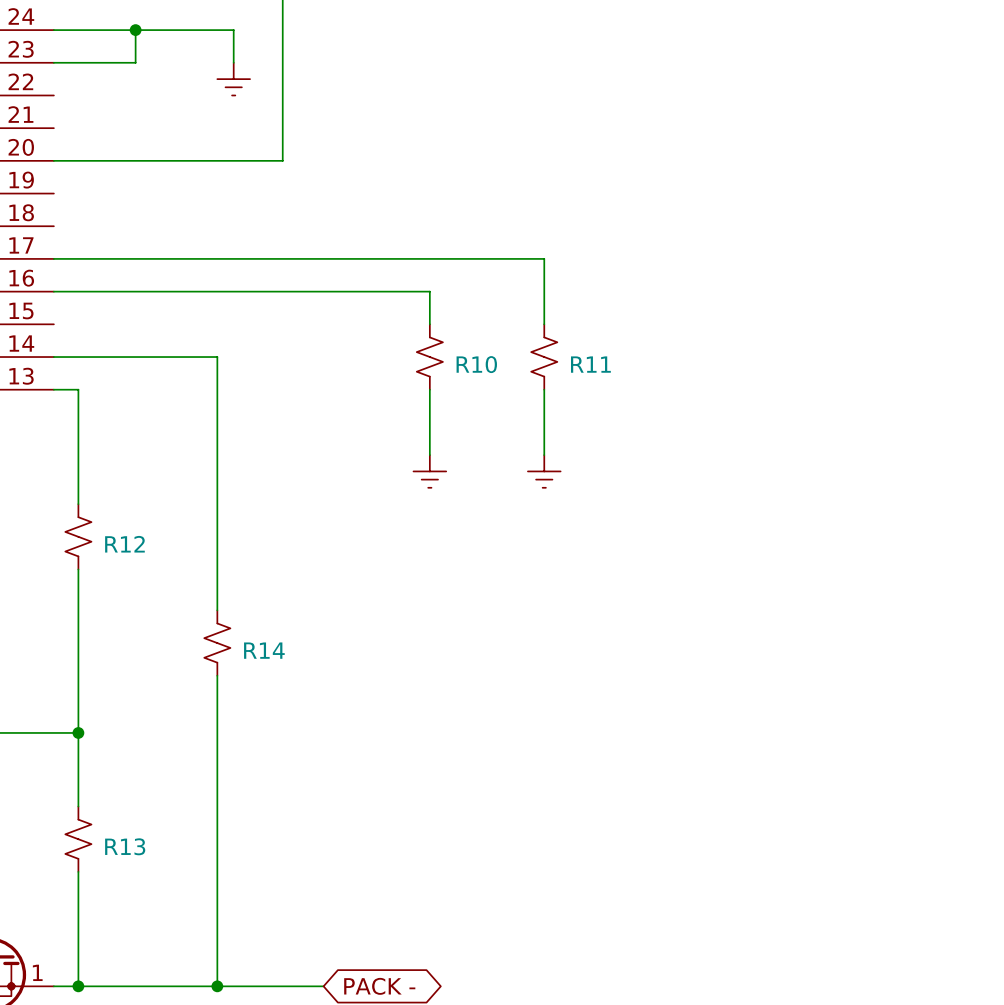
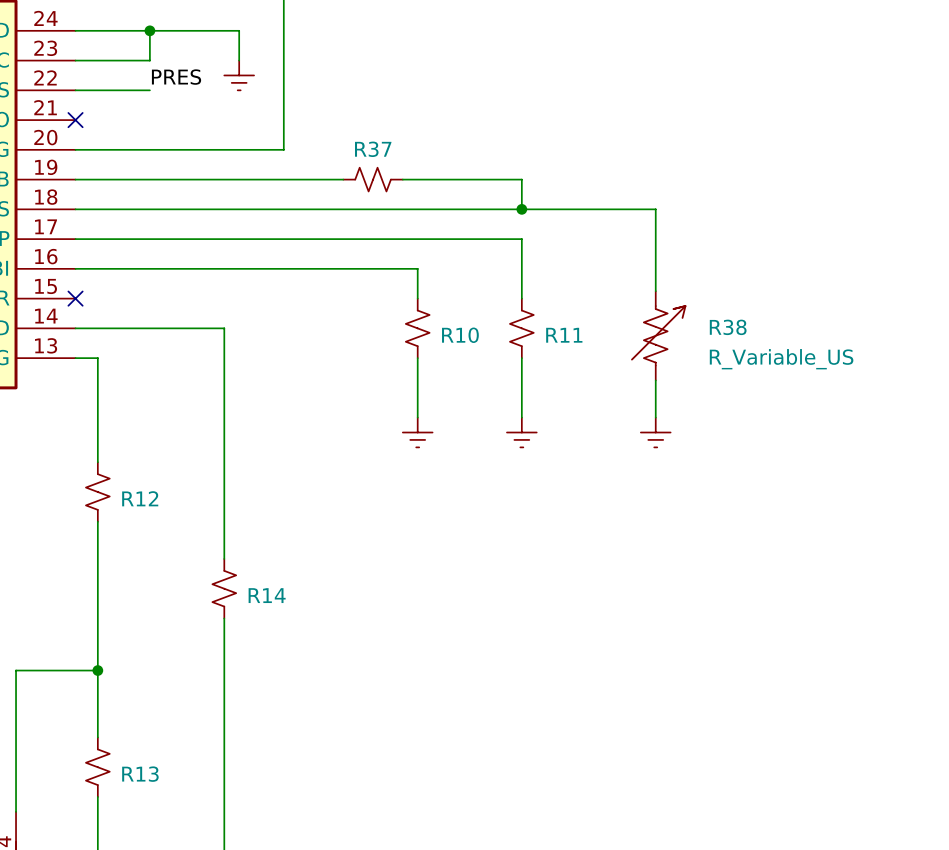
label: none -> PRES (176, 77)
wire: none -> (75, 90) (149, 90)
no-connect mark: none -> (75, 120)
wire: none -> (75, 179) (343, 179)
R37: none -> (373, 179)
wire: none -> (402, 179) (521, 179) (521, 209)
wire: none -> (75, 209) (655, 209) (655, 291)
junction: none -> (521, 209)
no-connect mark: none -> (75, 298)
R38: none -> R_Variable_US (658, 335)
wire: none -> (655, 380) (655, 417)
power symbol: none -> (655, 432)

